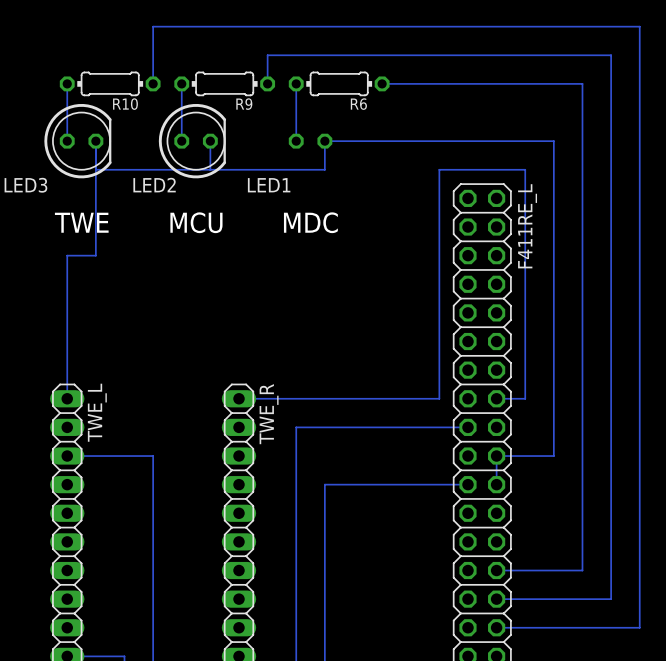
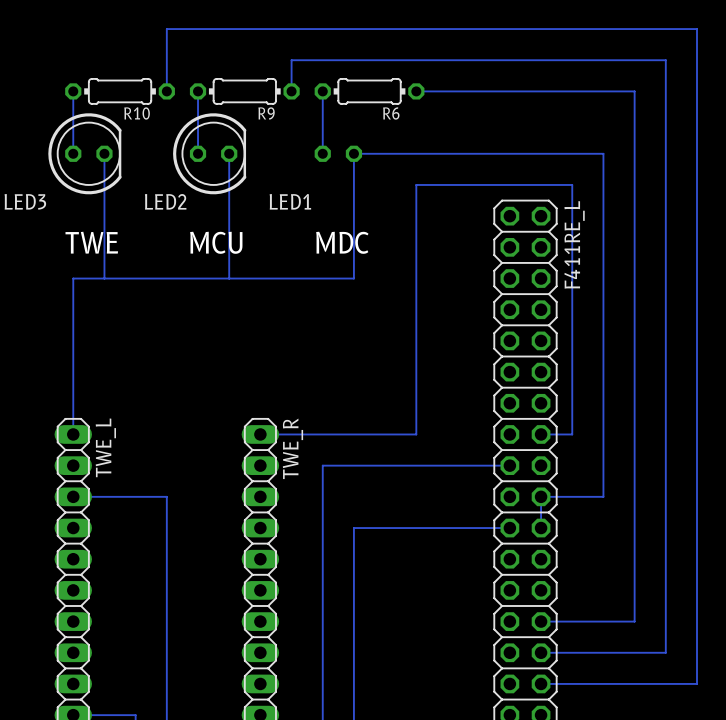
bottom track: (95, 169) (324, 169) -> (104, 278) (353, 278) (353, 184)
bottom track: none -> (229, 184) (229, 278)
bottom track: (439, 169) (439, 398) (382, 398) -> (478, 184) (416, 184) (416, 434)

